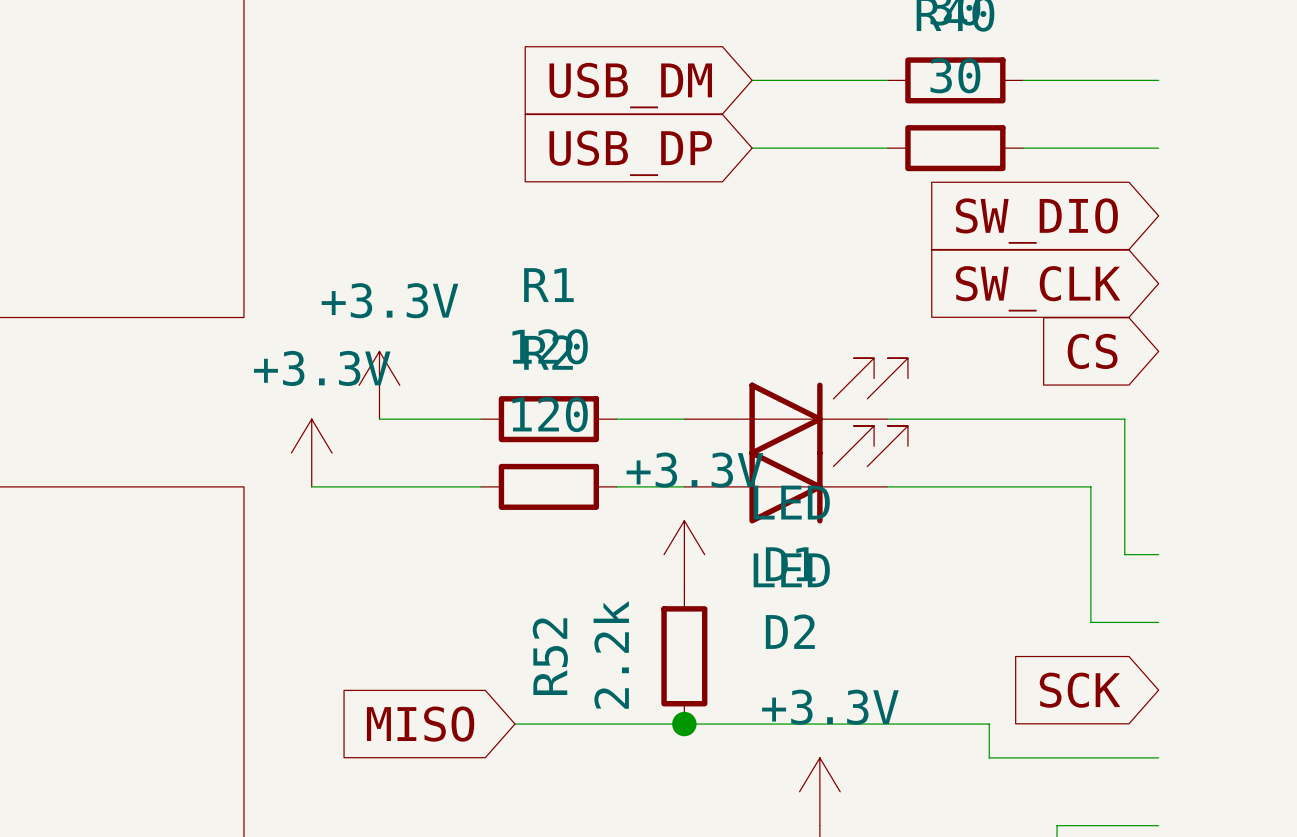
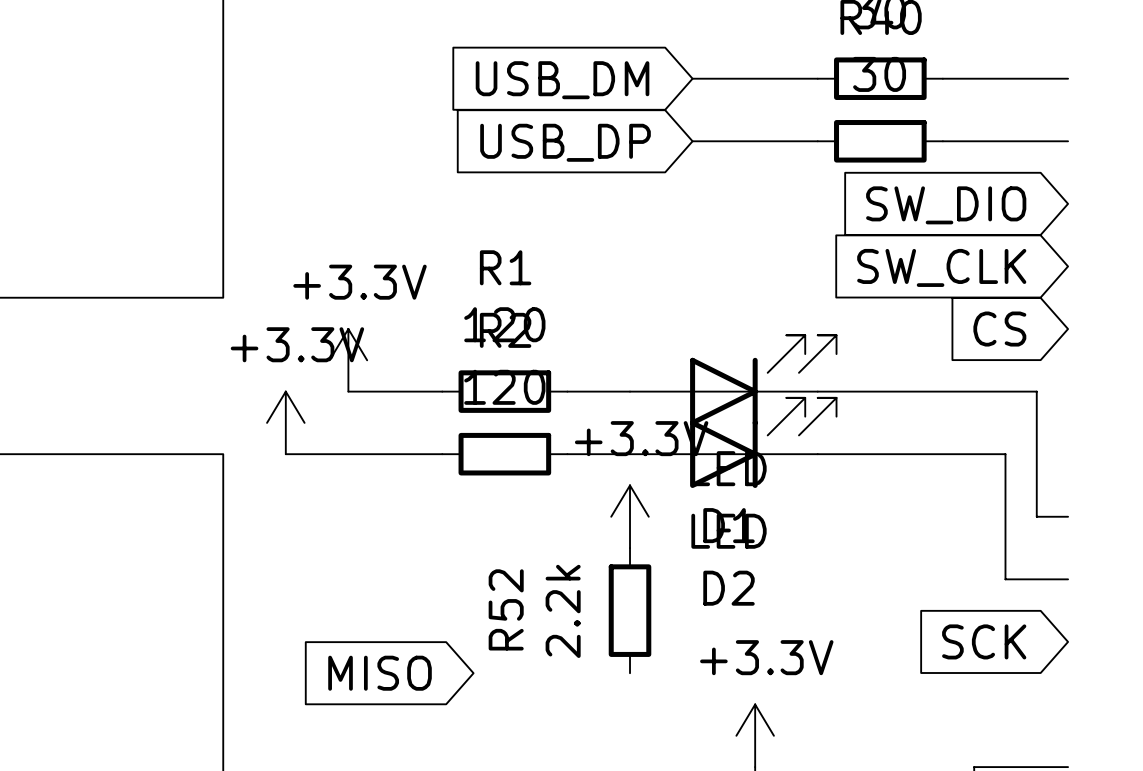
wire: (514, 724) (989, 724) (989, 757) (1158, 757) -> none
junction: (684, 724) -> none

